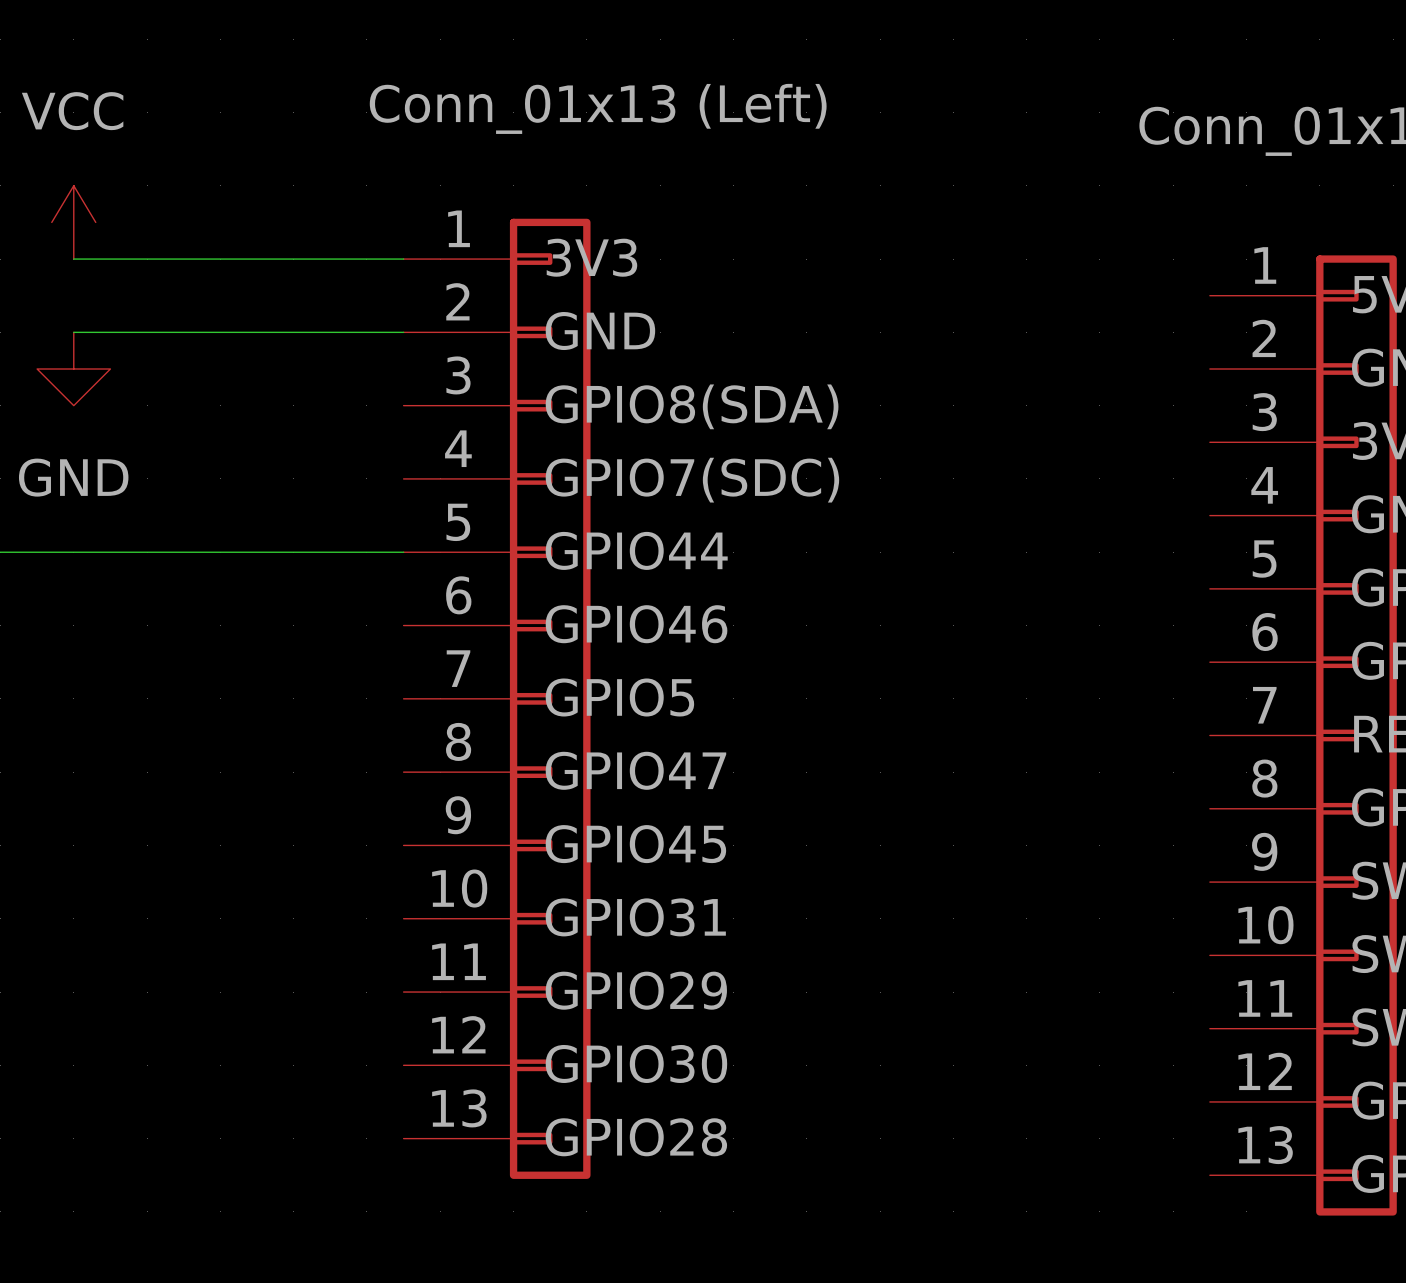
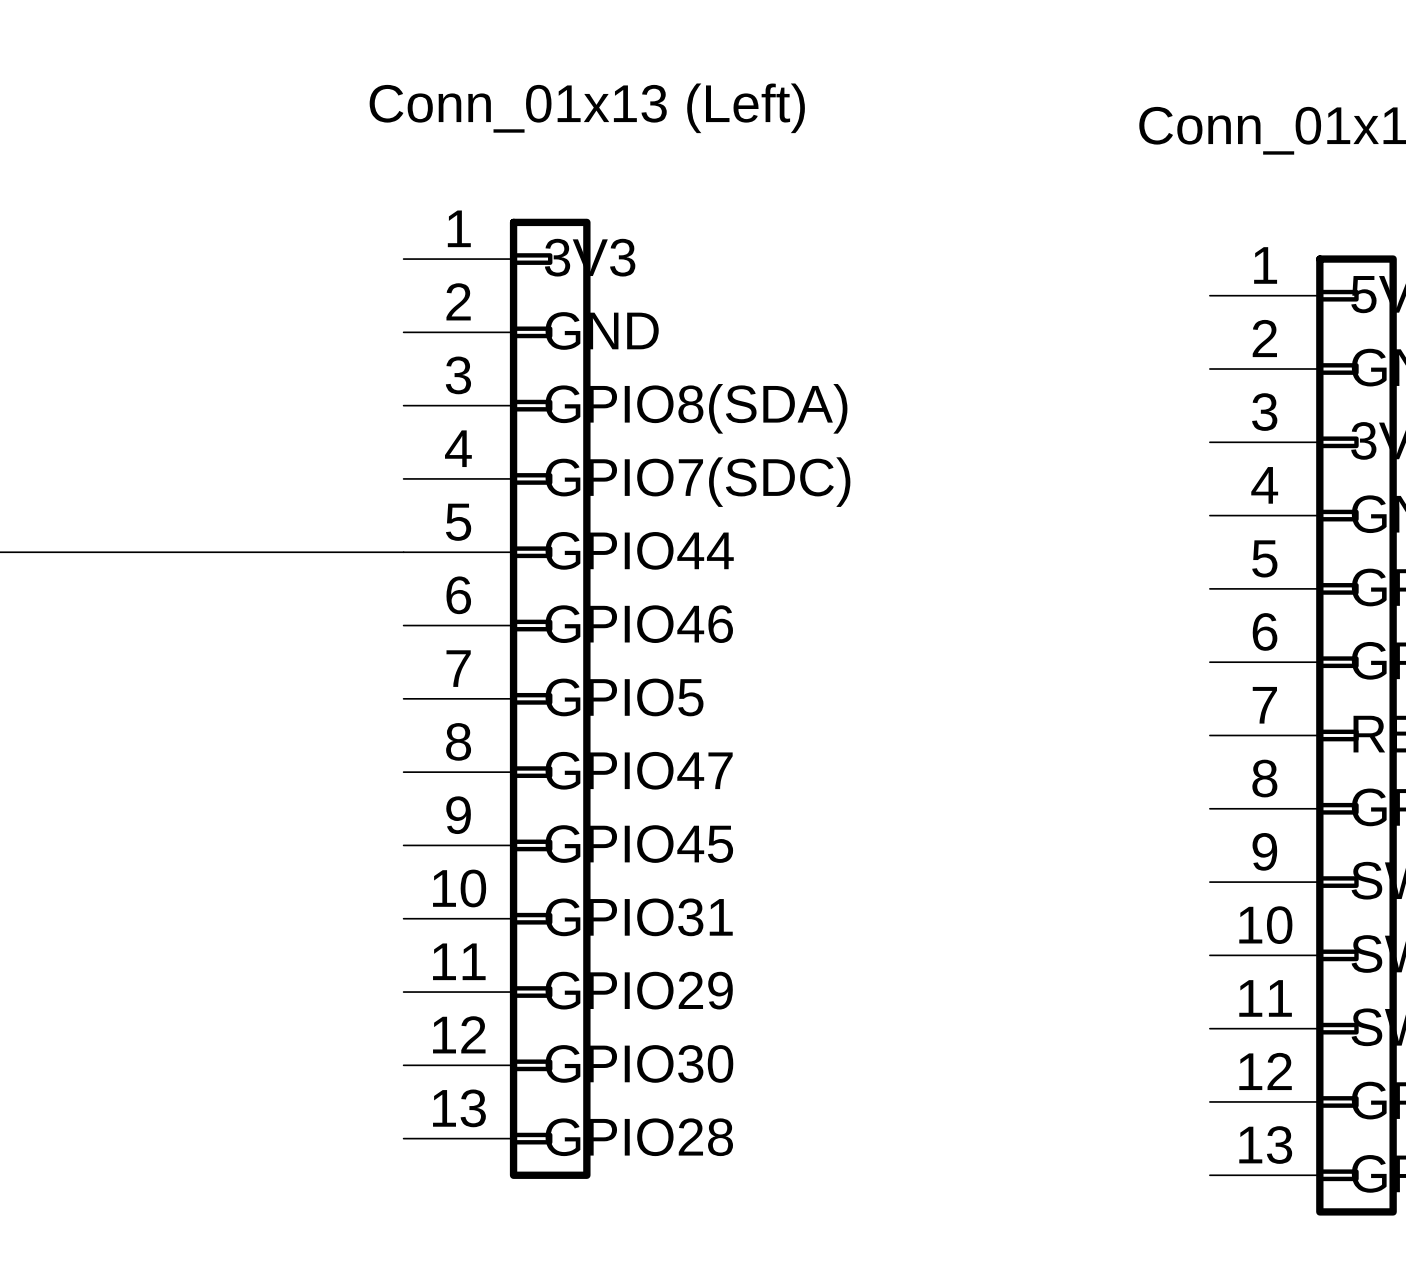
power symbol: VCC (73, 222) -> none
wire: (73, 259) (403, 259) -> none
wire: (73, 332) (403, 332) -> none
power symbol: GND (73, 369) -> none

